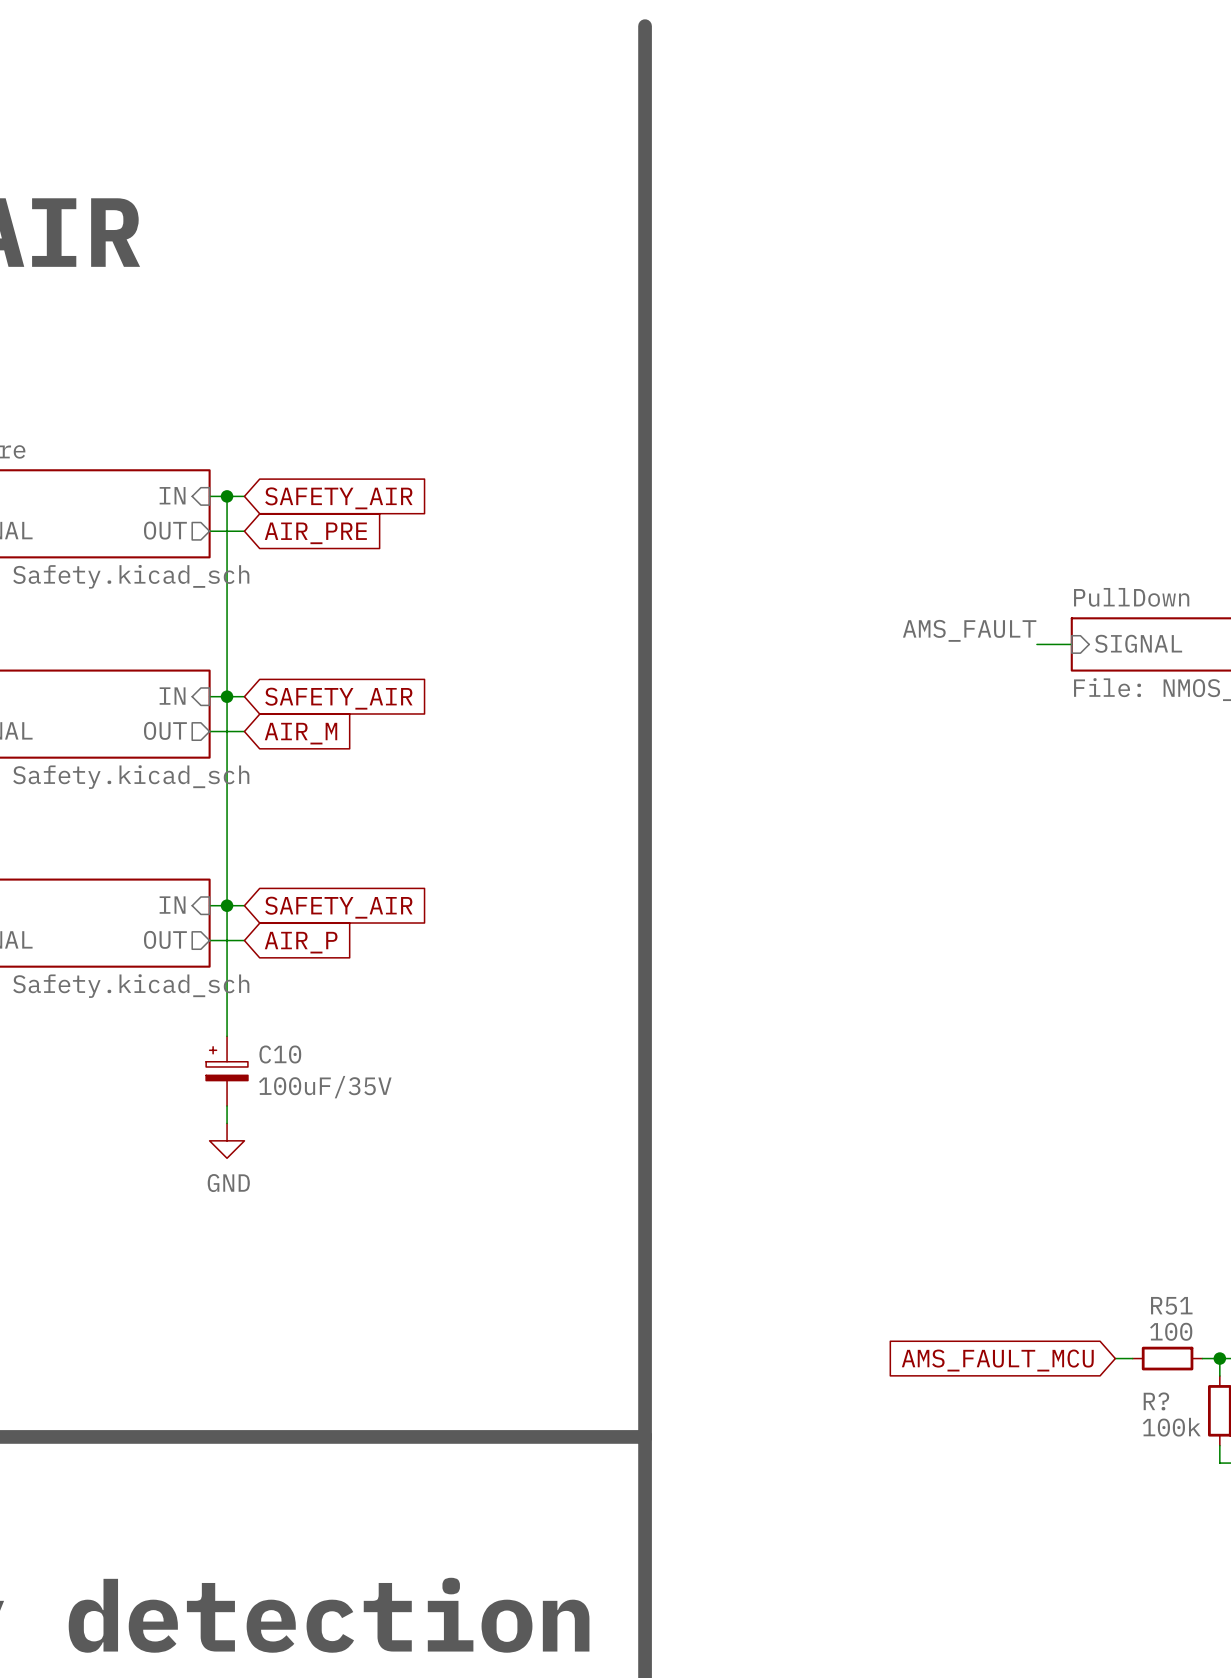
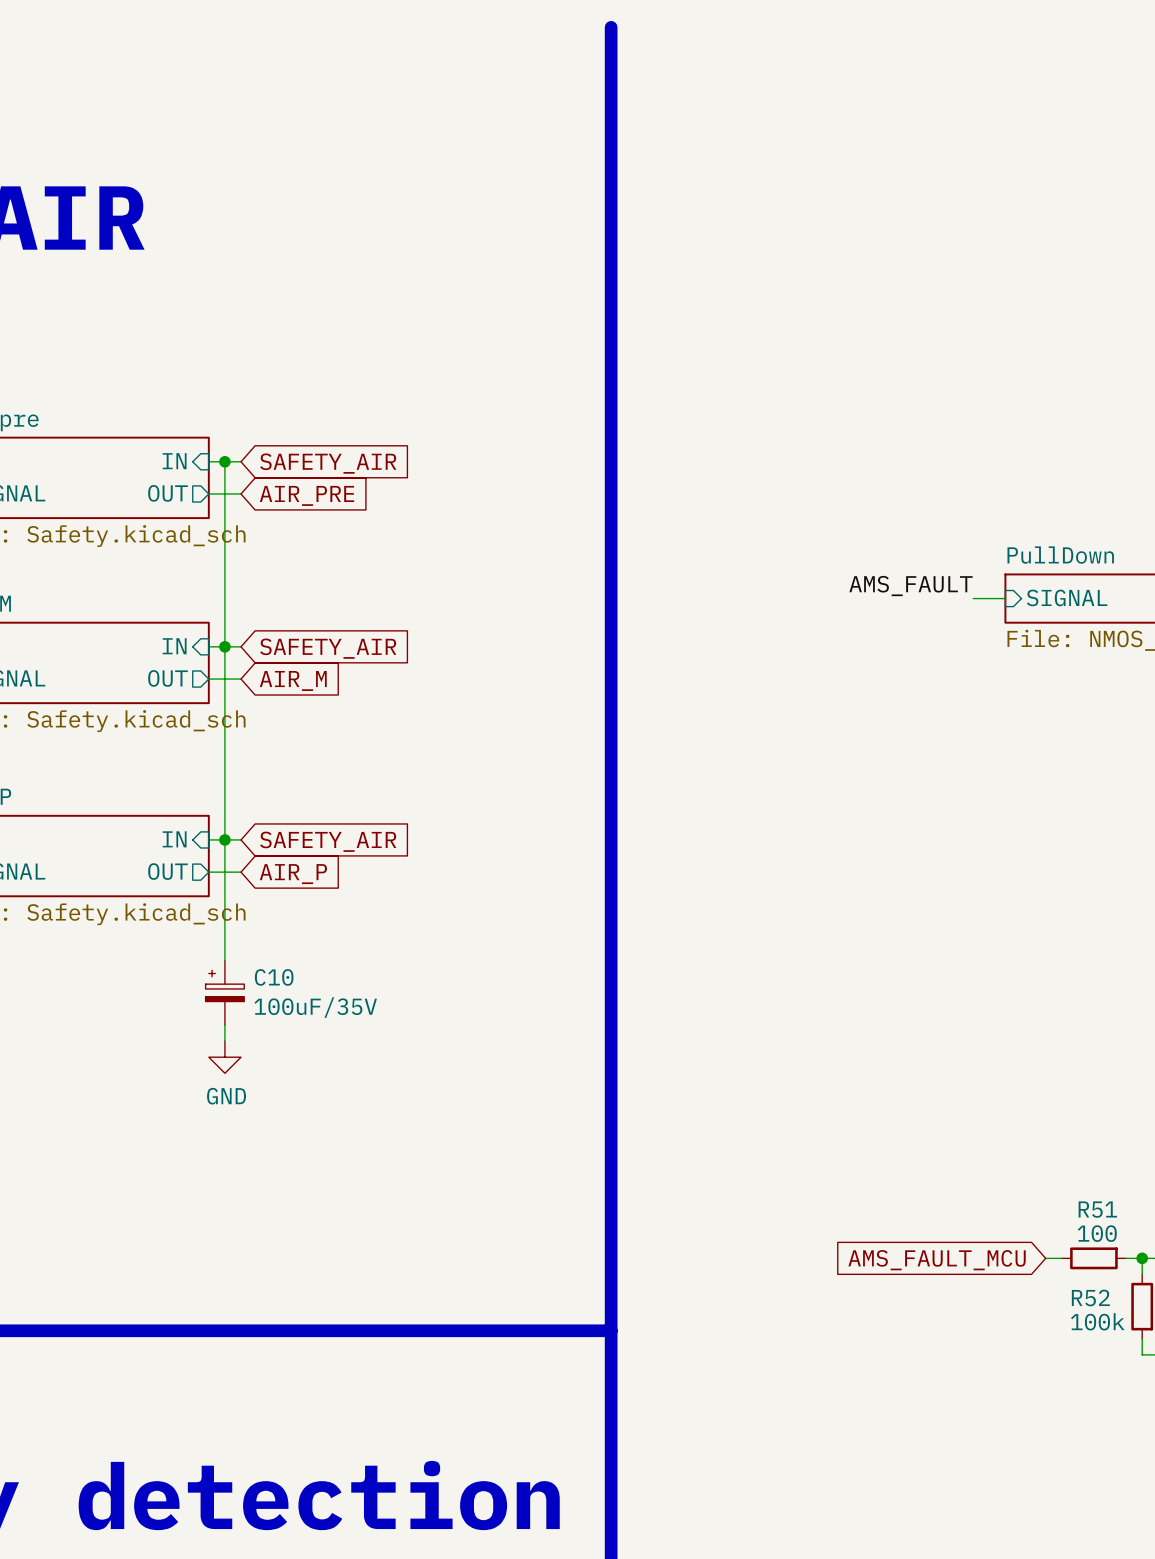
R? name: R? (1156, 1401) -> R52 (1090, 1297)

